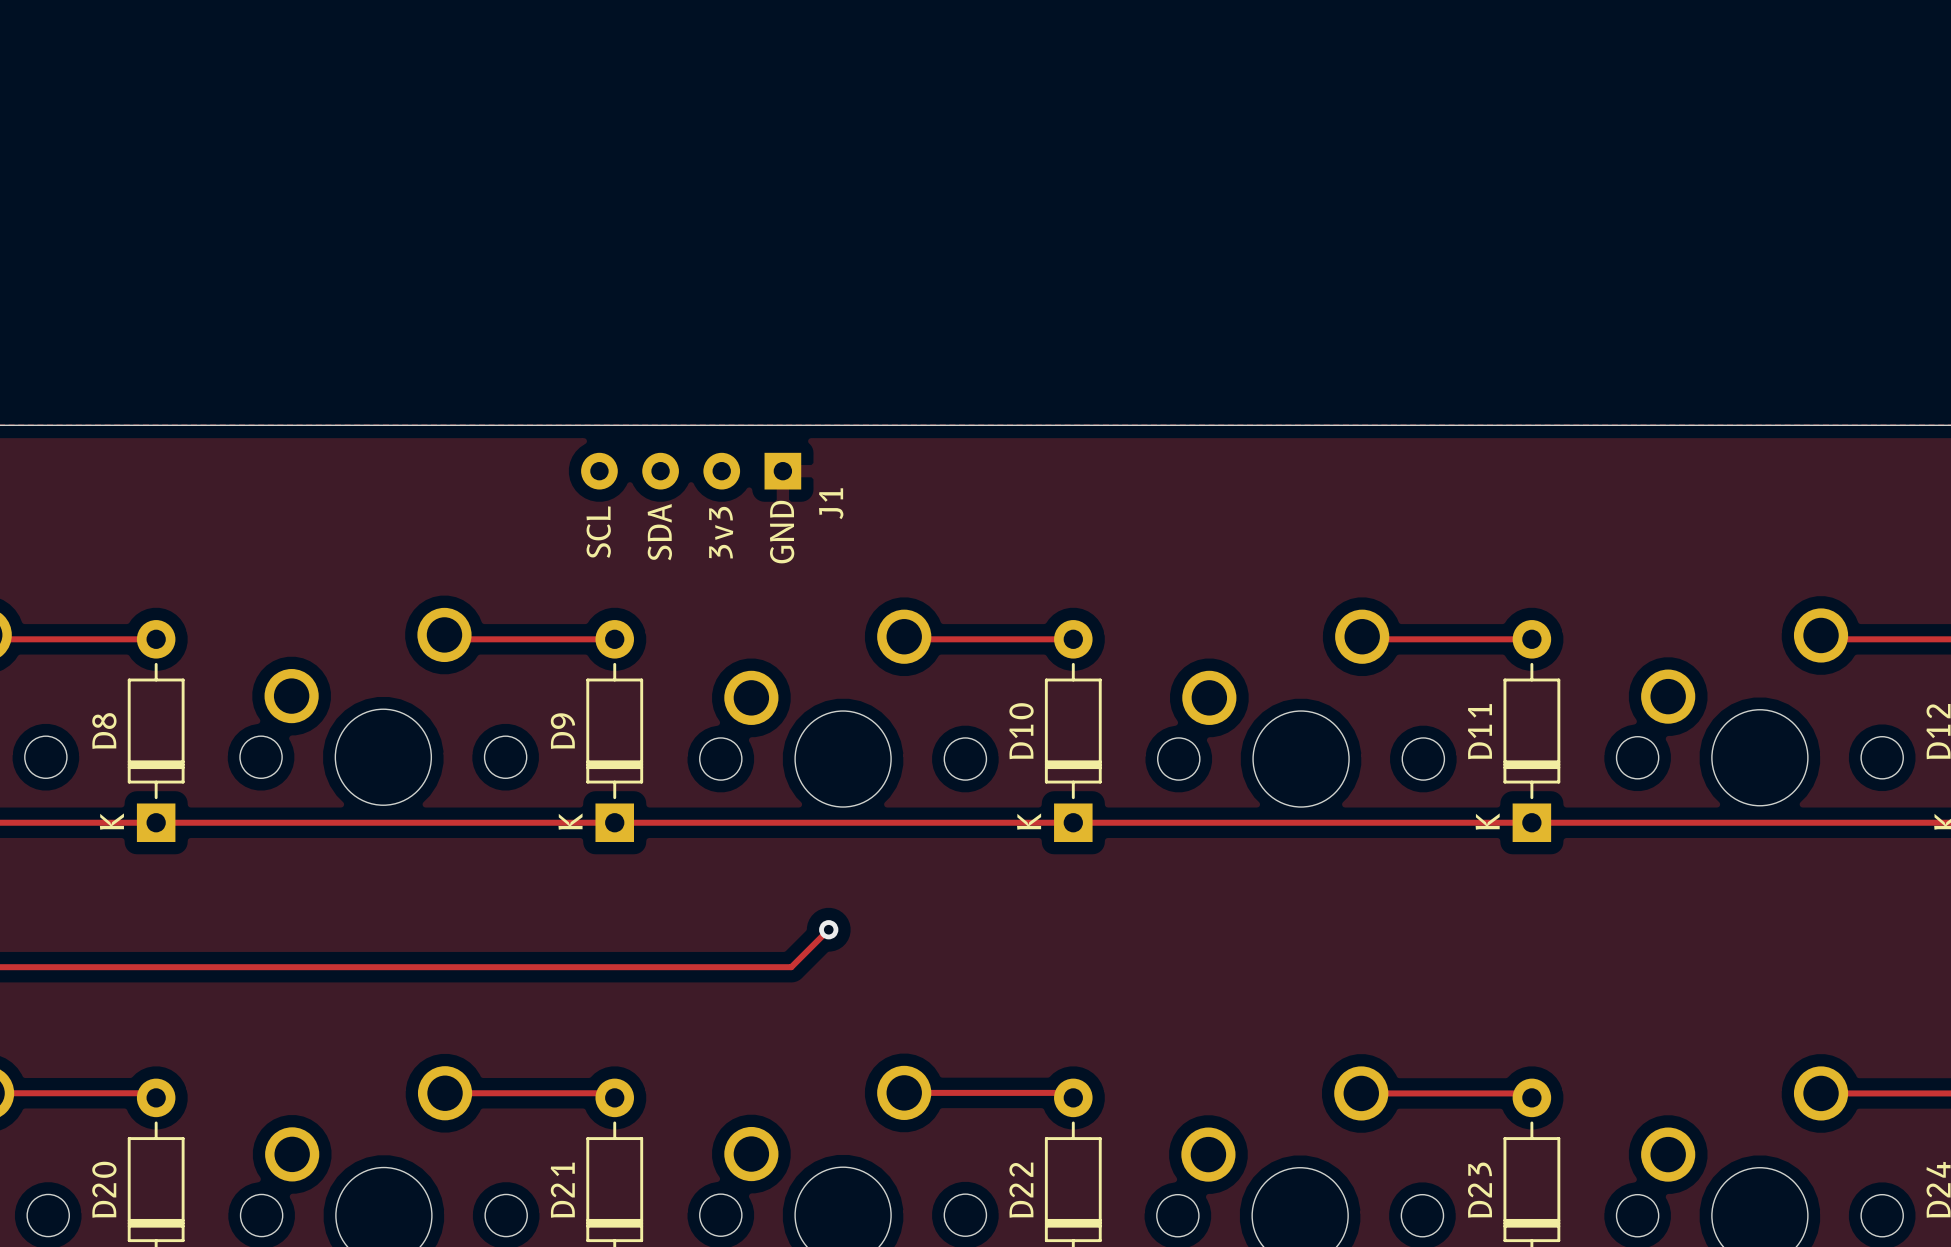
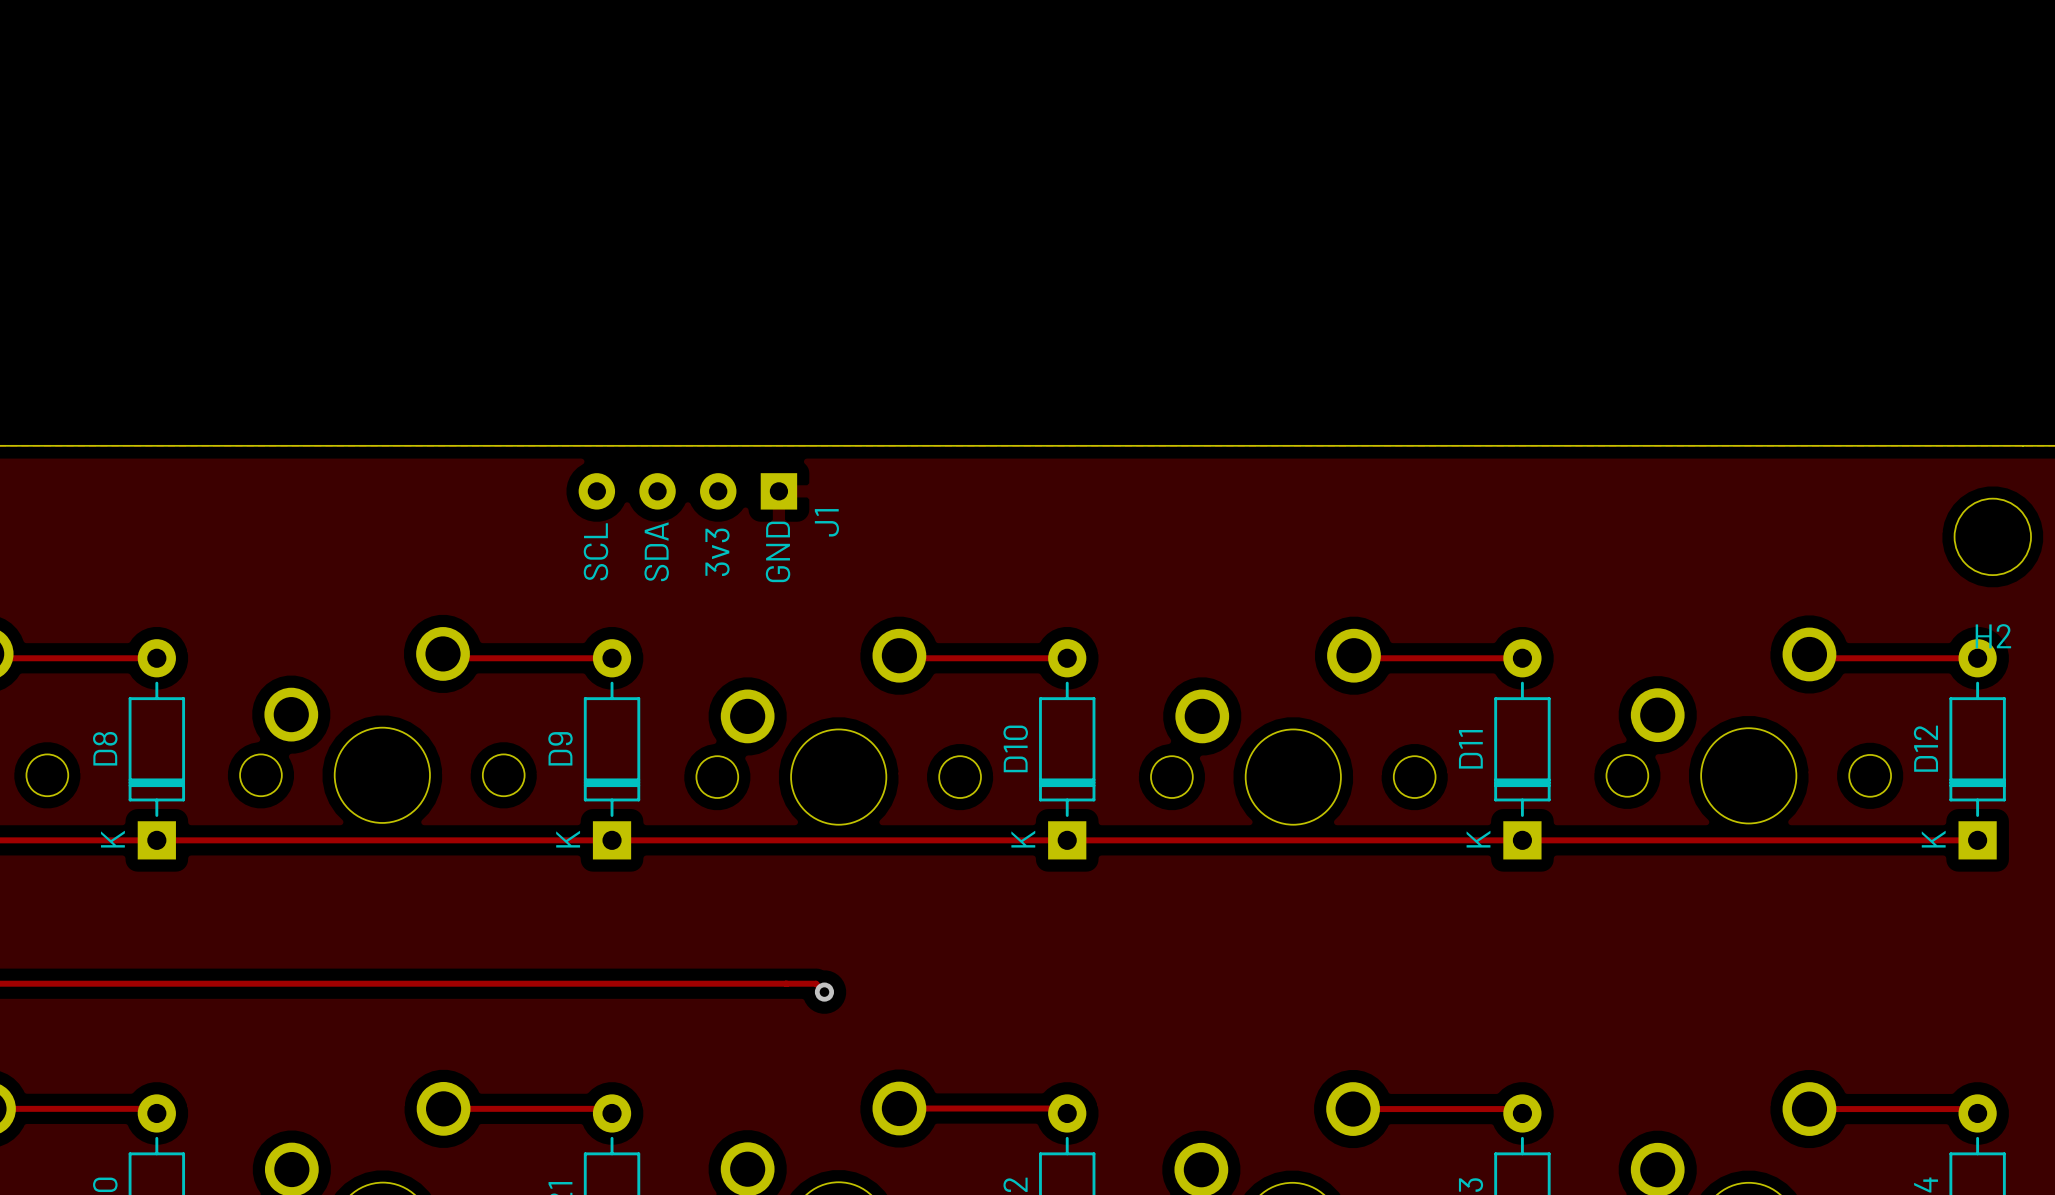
track: (828, 929) (791, 967) -> (824, 992) (816, 983) (787, 983)
via position: (828, 929) -> (824, 992)

